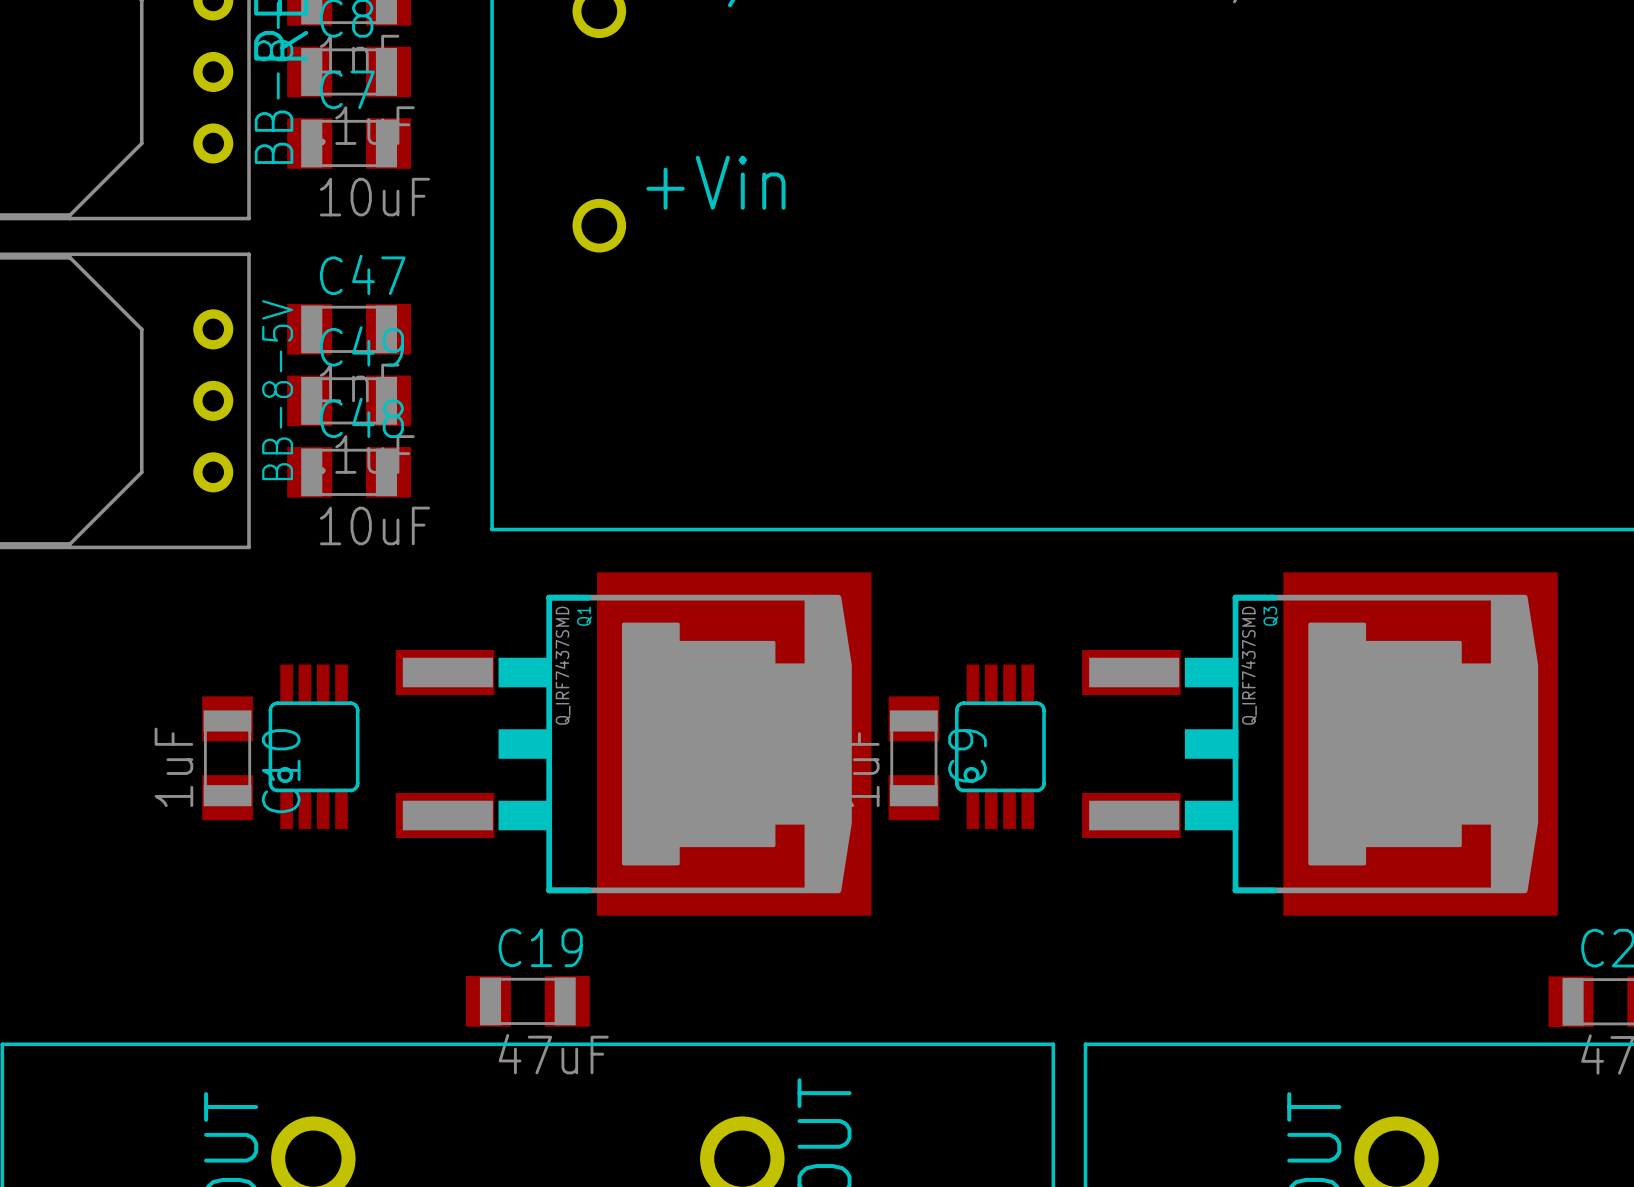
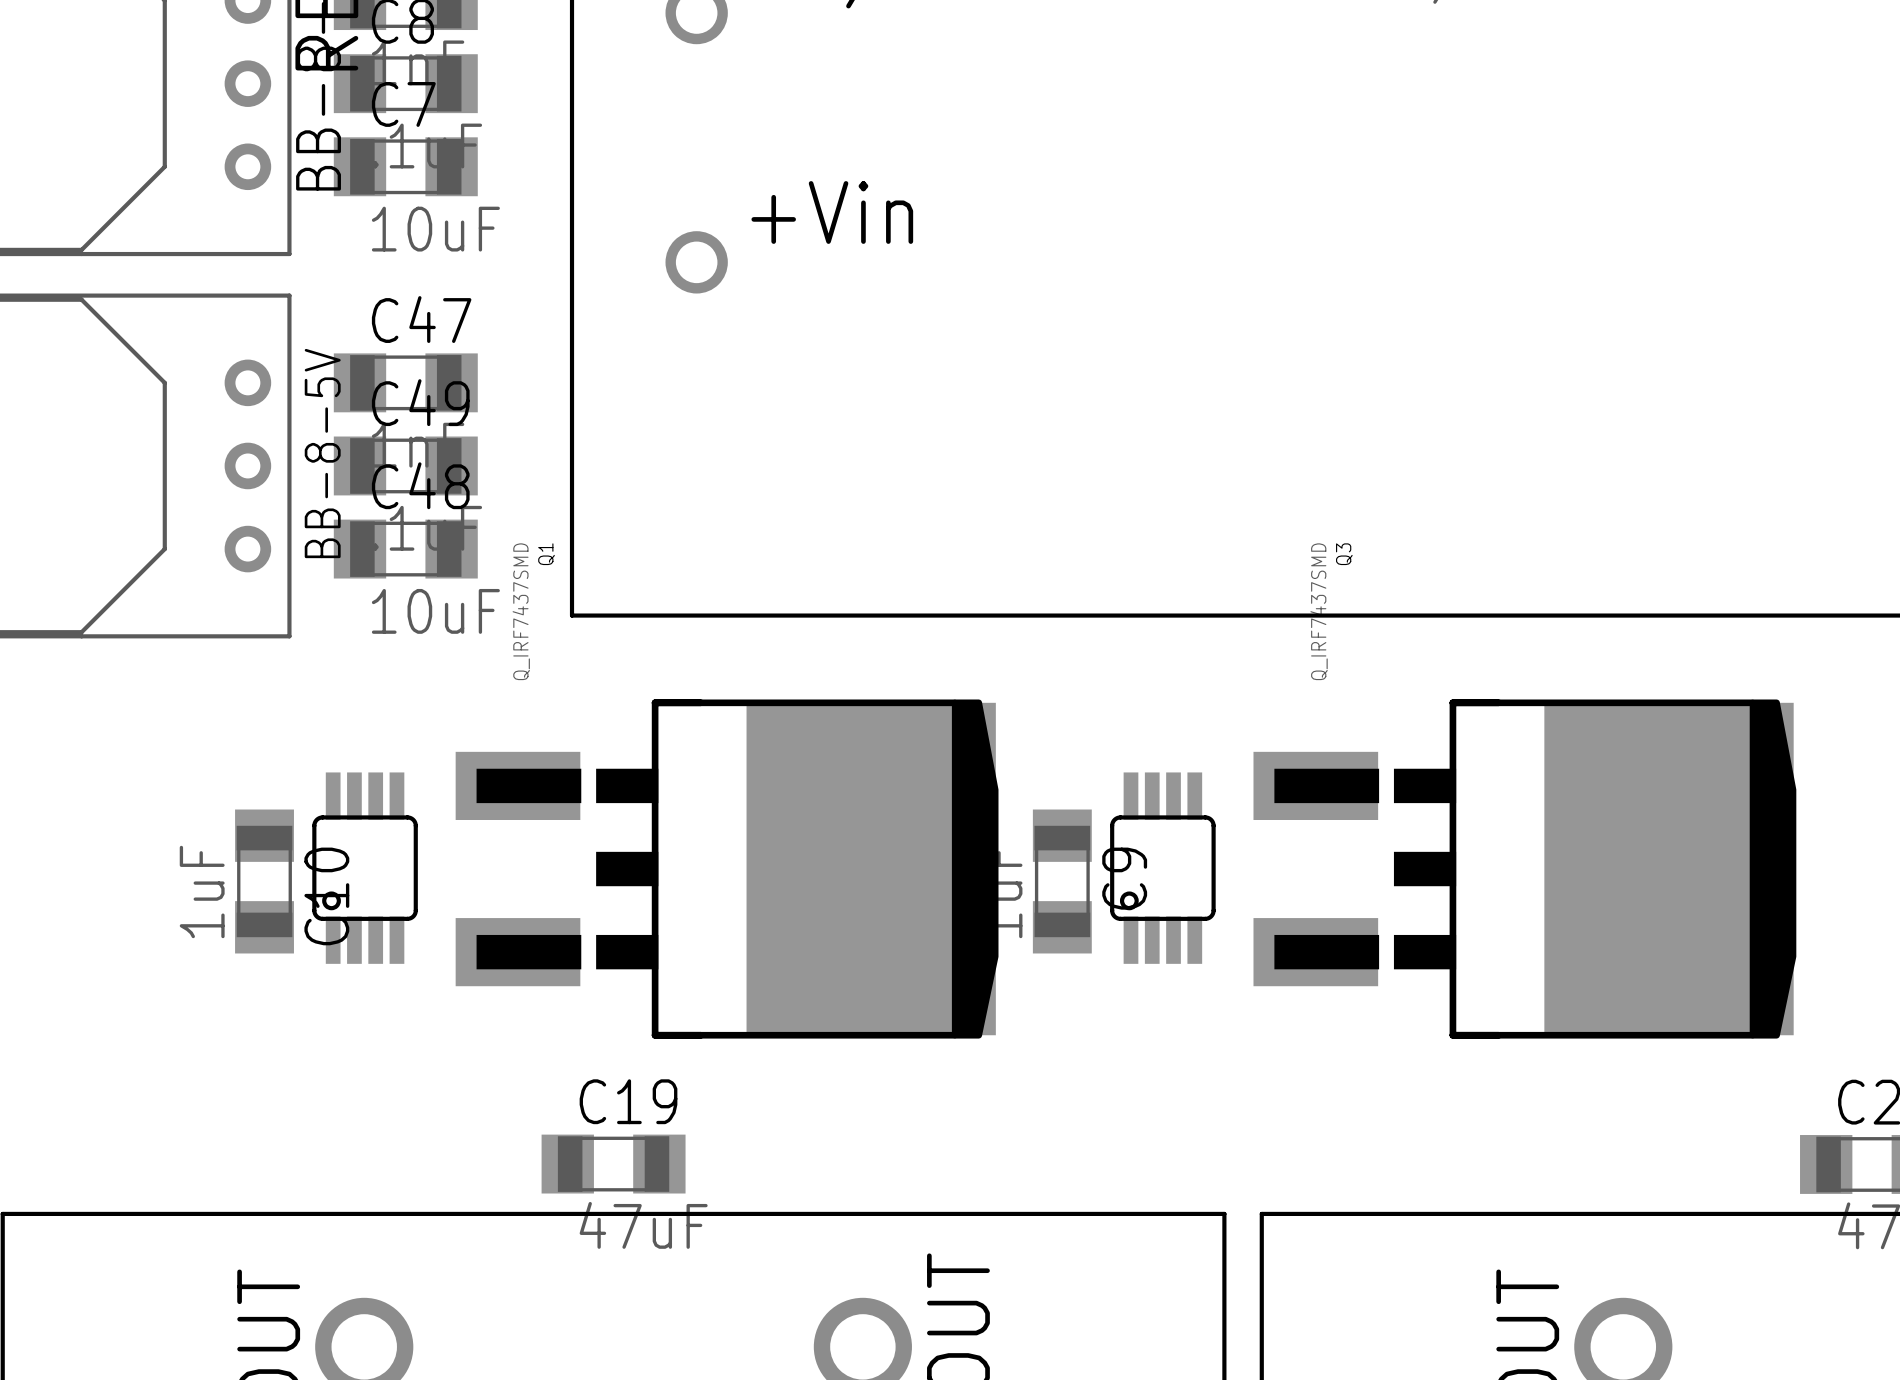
Q1 footprint: [395, 572, 872, 916] -> [455, 699, 999, 1039]
Q3 footprint: [1082, 572, 1558, 916] -> [1253, 699, 1797, 1039]
Q1 name position: Q1 (584, 616) -> Q1 (546, 554)
Q3 name position: Q3 (1270, 616) -> Q3 (1344, 554)
Q1 value position: Q_IRF7437SMD (562, 665) -> Q_IRF7437SMD (521, 611)
Q3 value position: Q_IRF7437SMD (1249, 665) -> Q_IRF7437SMD (1319, 611)

